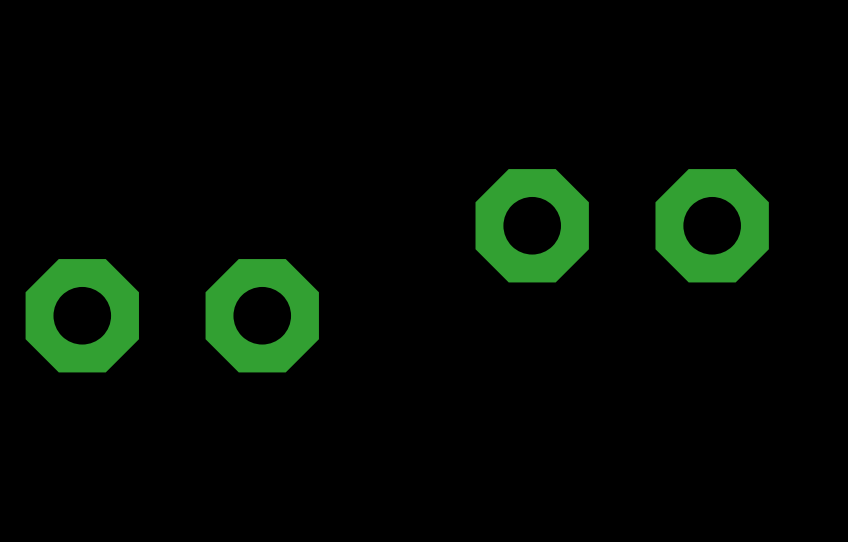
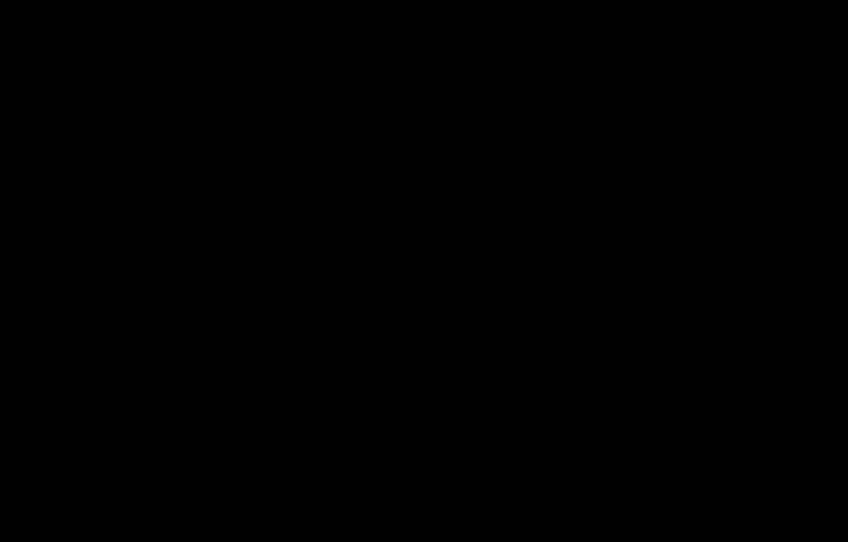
part: (622, 225) -> none
part: (172, 315) -> none

